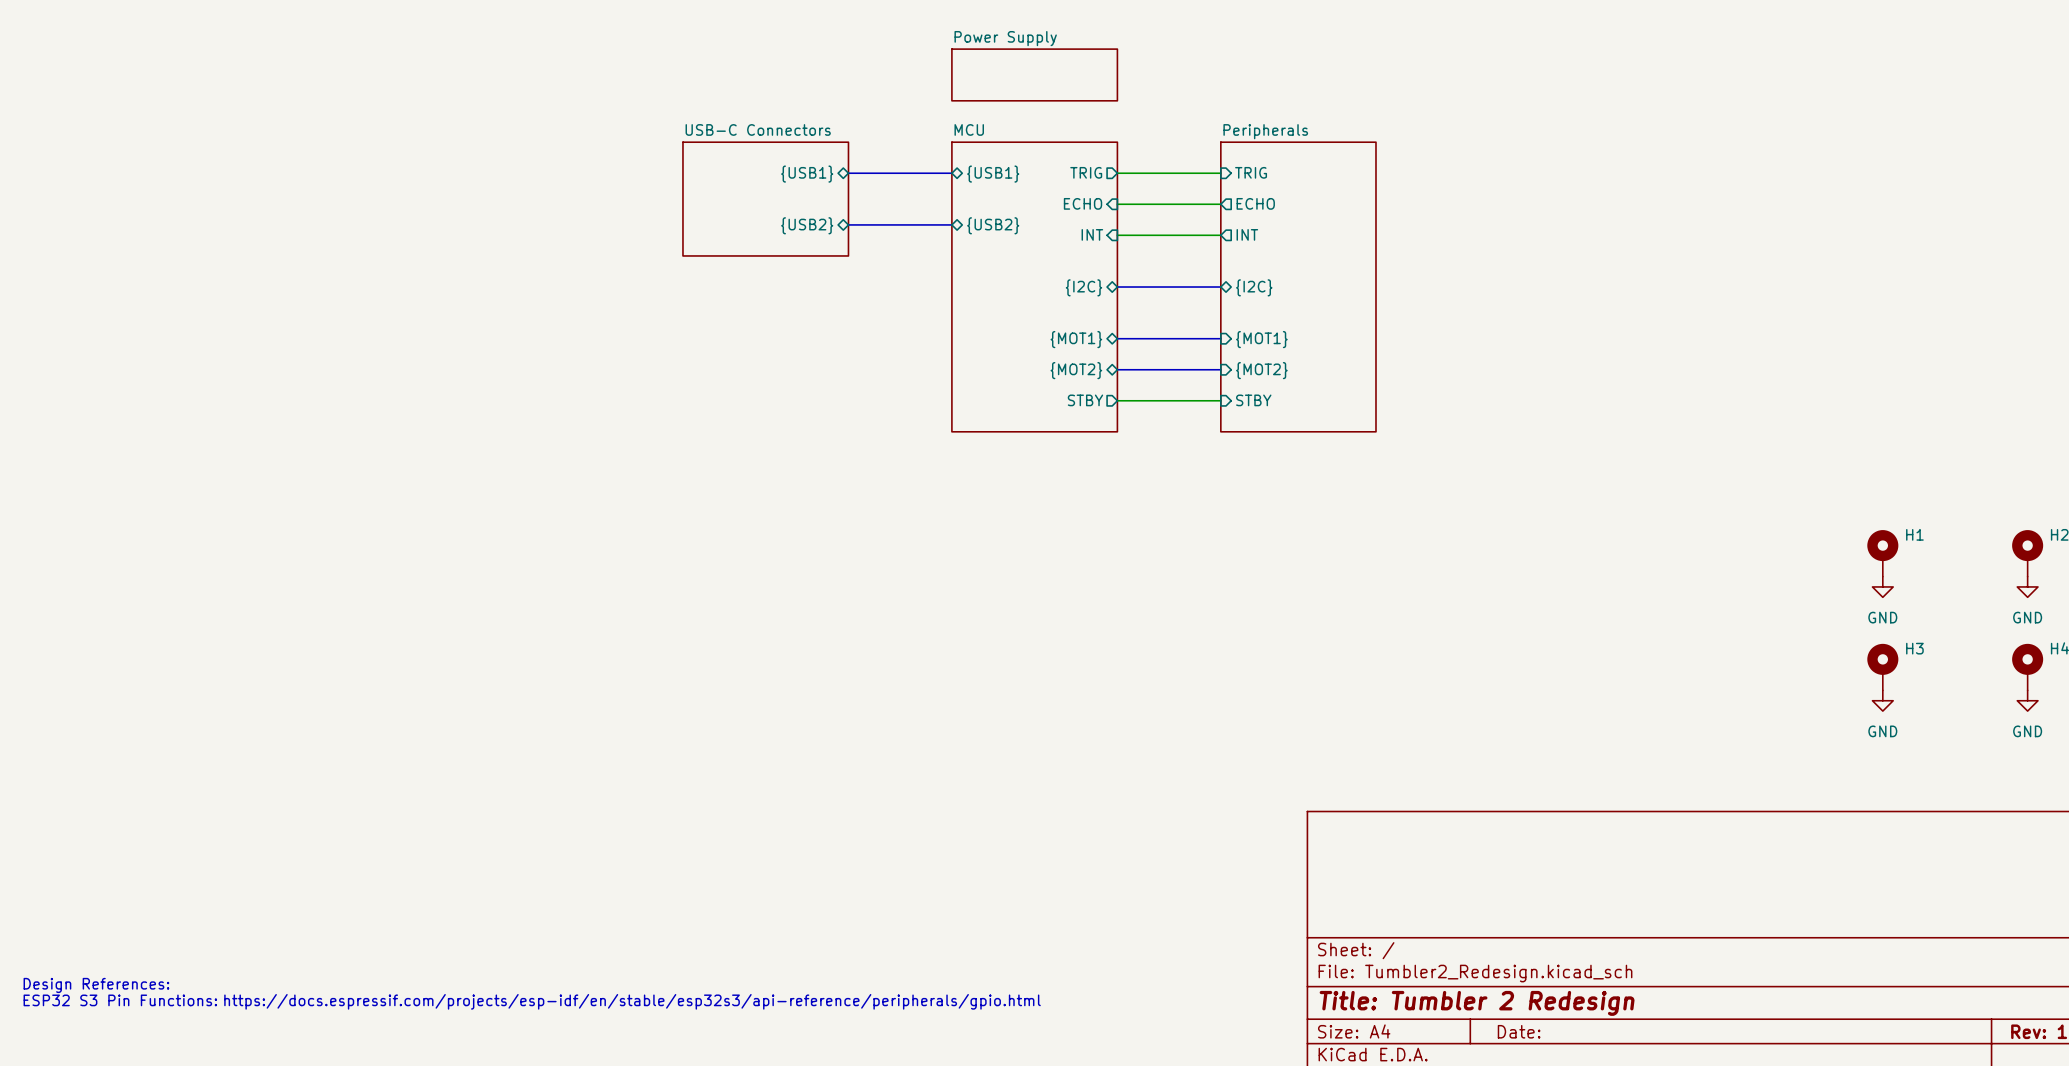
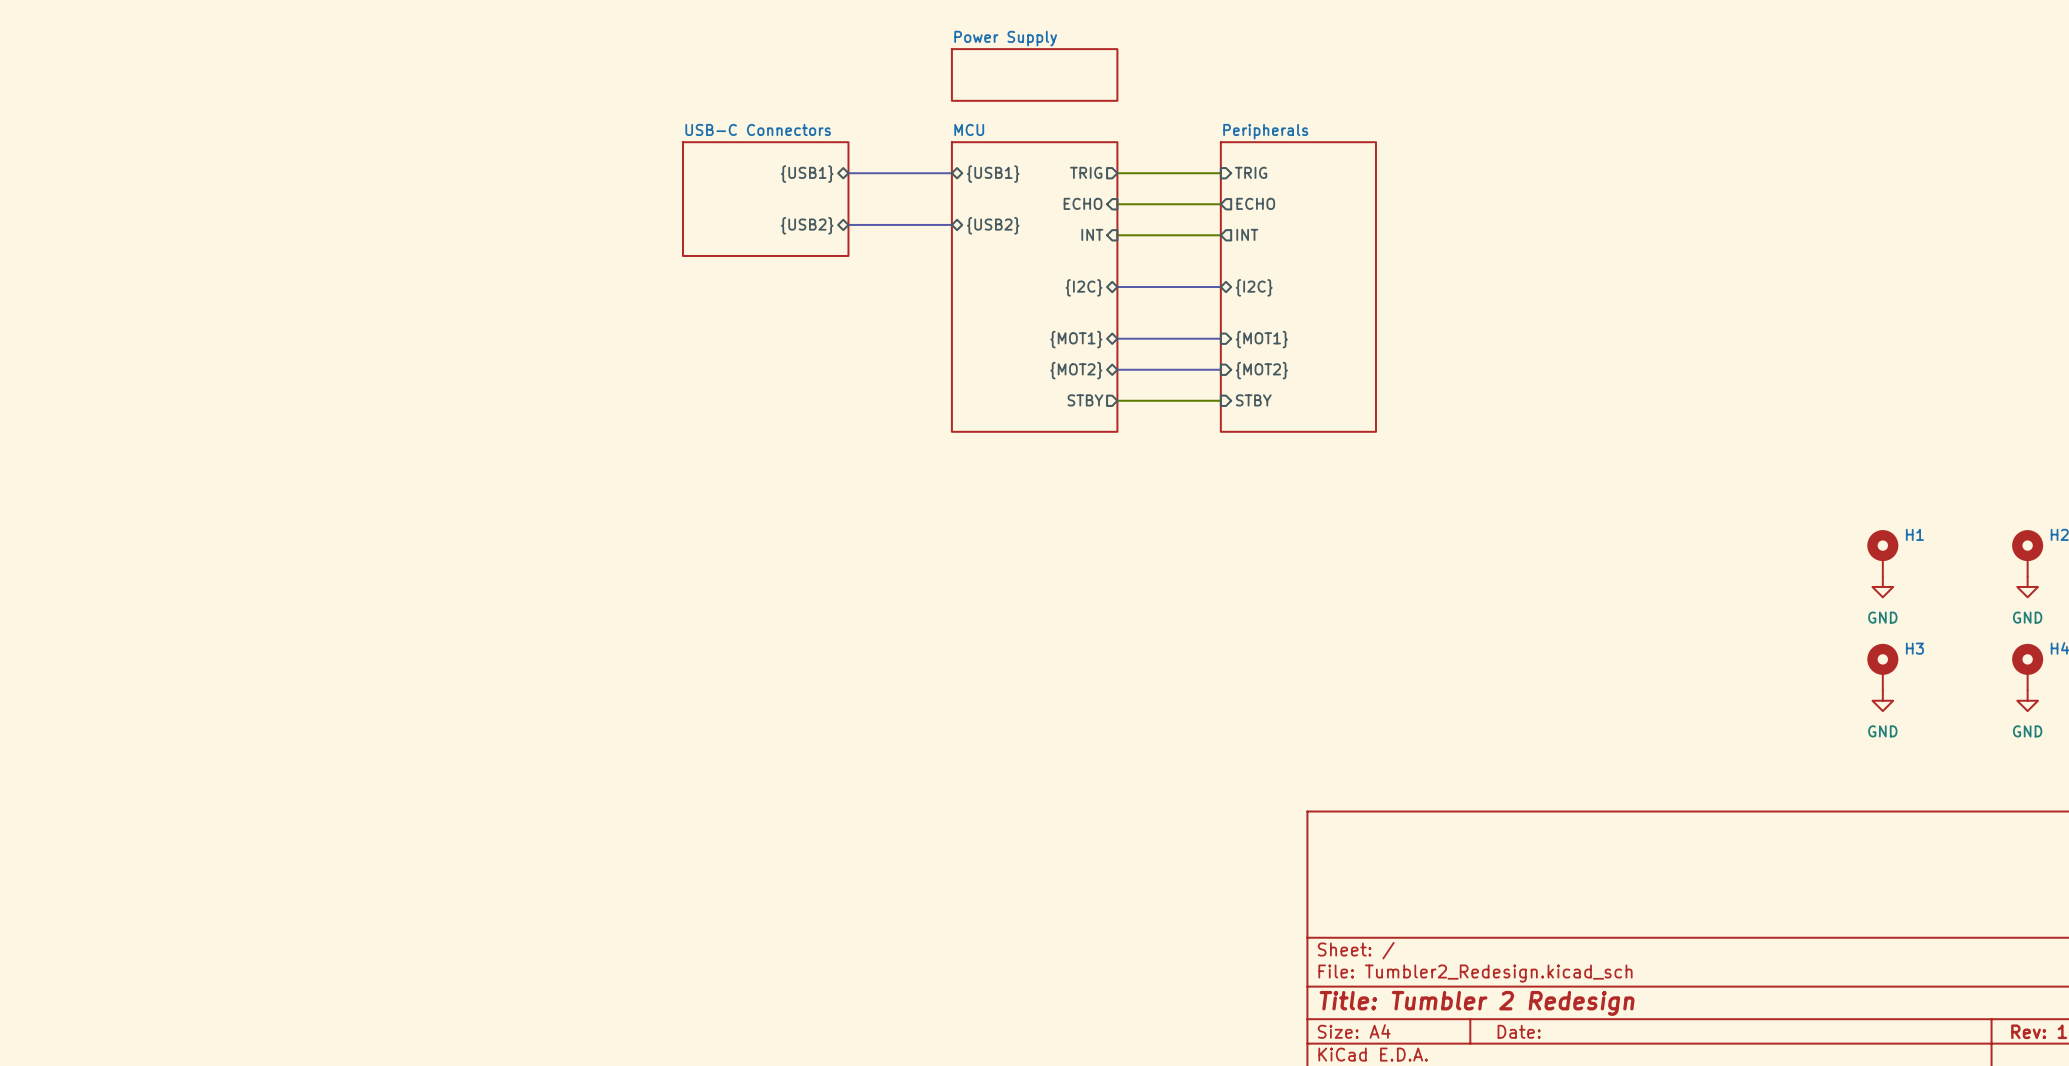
text: Design References: (96, 985) -> none
text: ESP32 S3 Pin Functions: (120, 1000) -> none
text: https://docs.espressif.com/projects/esp-idf/en/stable/esp32s3/api-reference/peripherals/gpio.html (632, 1001) -> none

